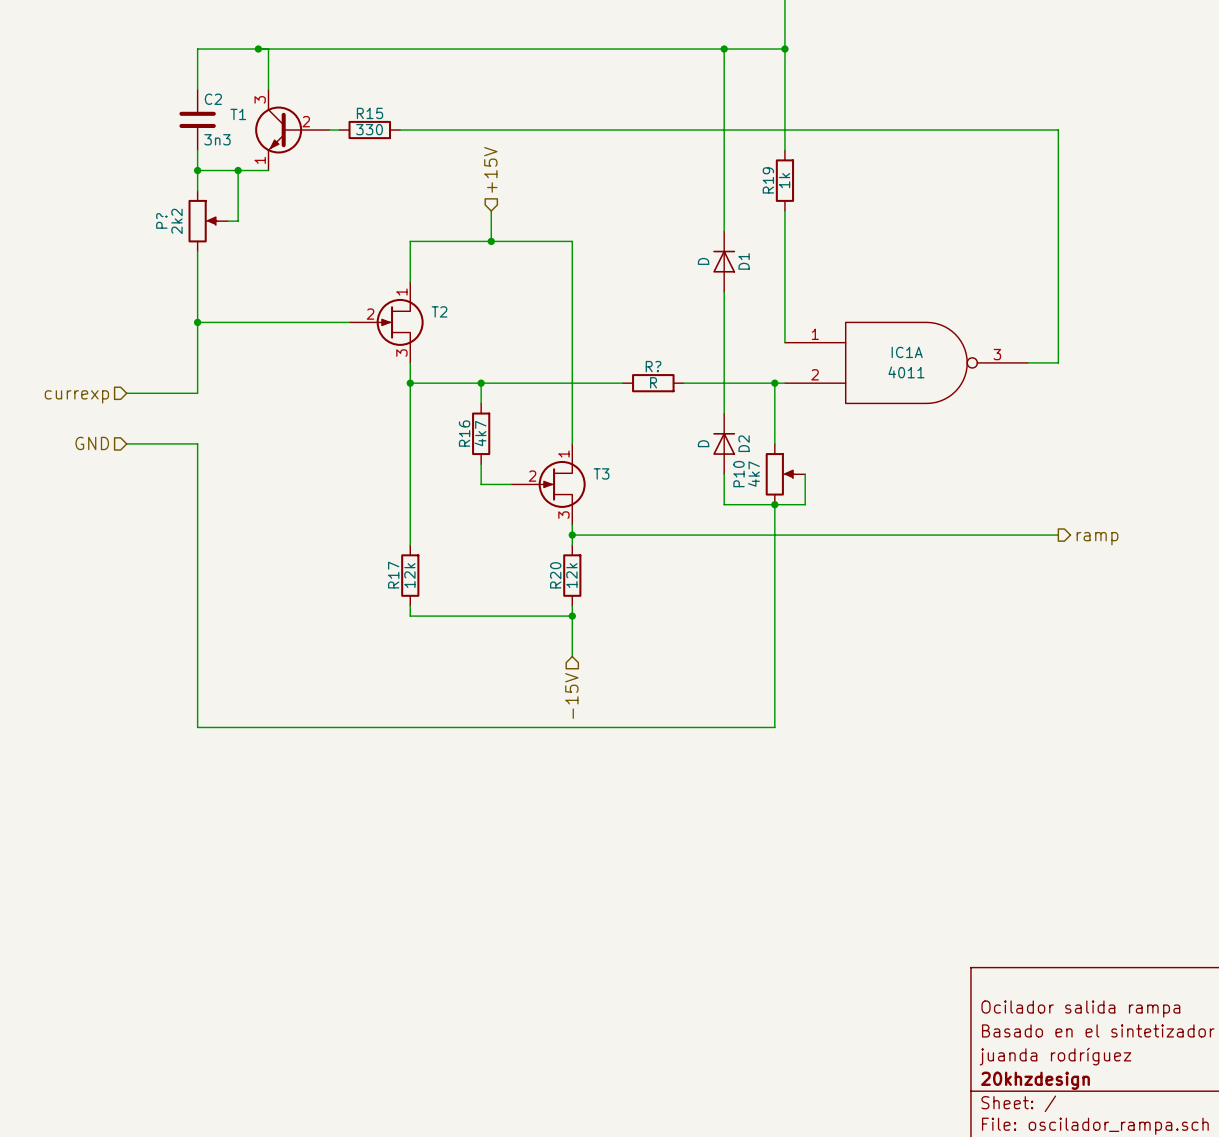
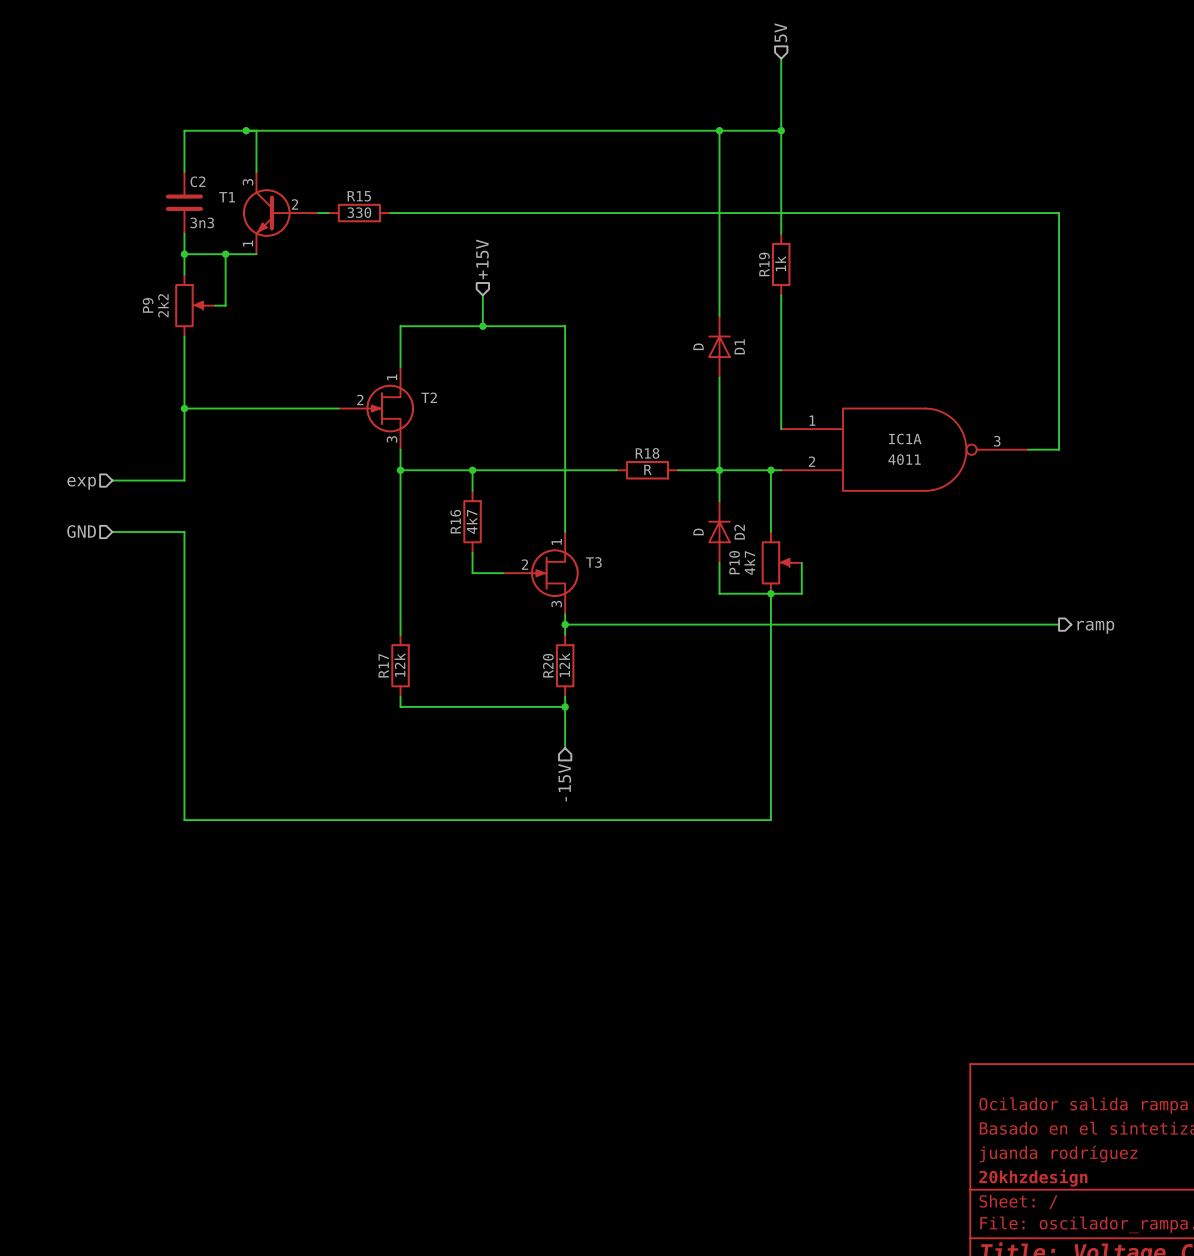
P? name: P? (161, 220) -> P9 (148, 305)
R? name: R? (653, 366) -> R18 (647, 453)
junction: none -> (719, 470)
hierarchical label: currexp (76, 396) -> exp (81, 483)

